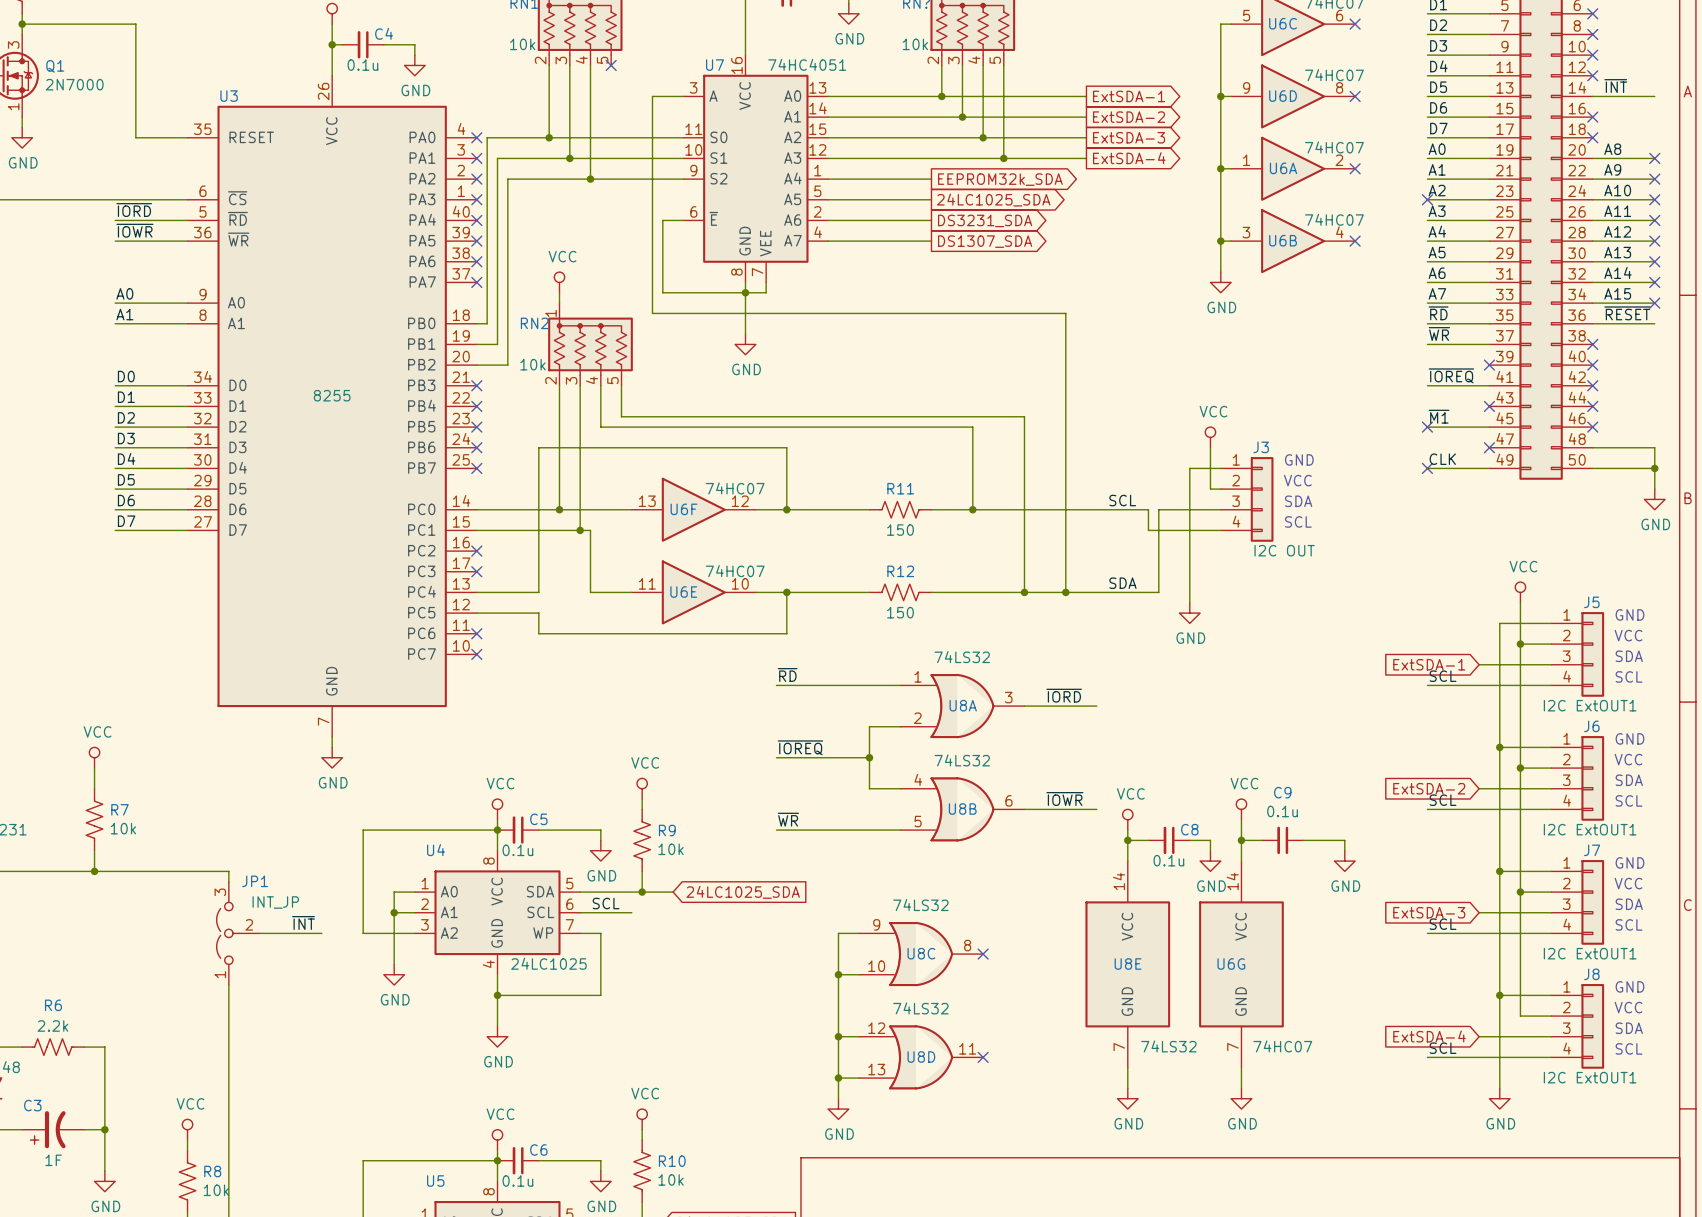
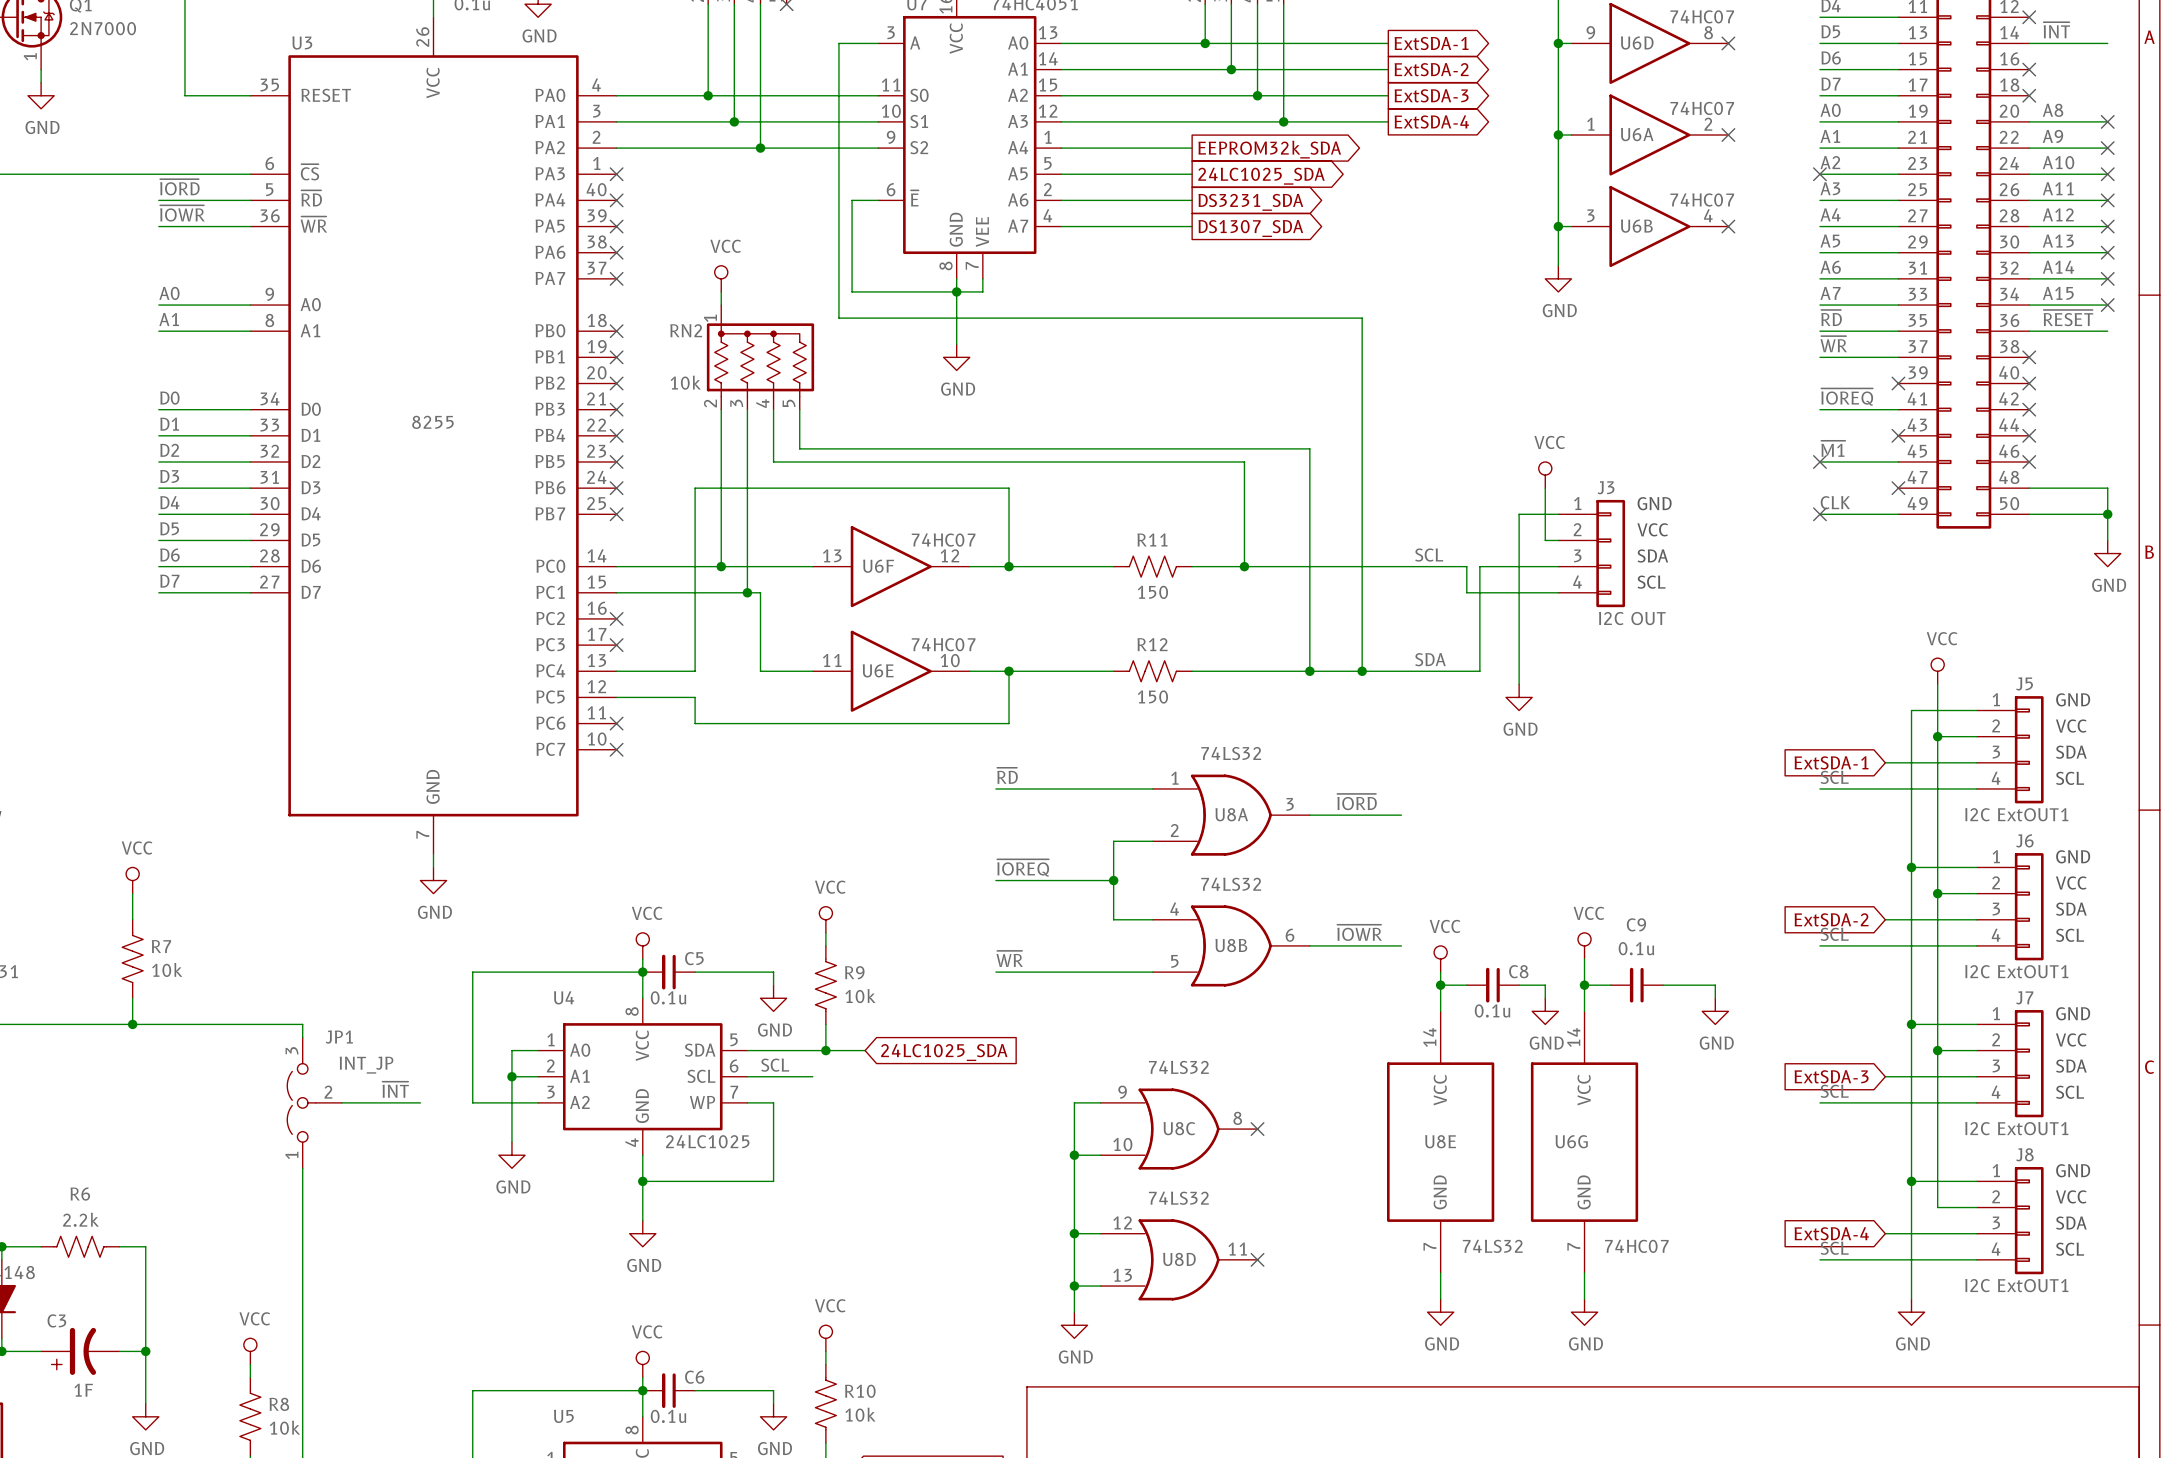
no-connect mark: (476, 137) -> none
wire: (487, 137) (487, 323) (476, 323) -> (629, 95) (616, 95)
no-connect mark: (476, 158) -> none
wire: (497, 158) (497, 344) (476, 344) -> (642, 121) (616, 121)
no-connect mark: (476, 179) -> none
wire: (507, 179) (507, 365) (476, 365) -> (655, 148) (616, 148)
no-connect mark: none -> (616, 331)
no-connect mark: none -> (616, 357)
no-connect mark: none -> (616, 383)

